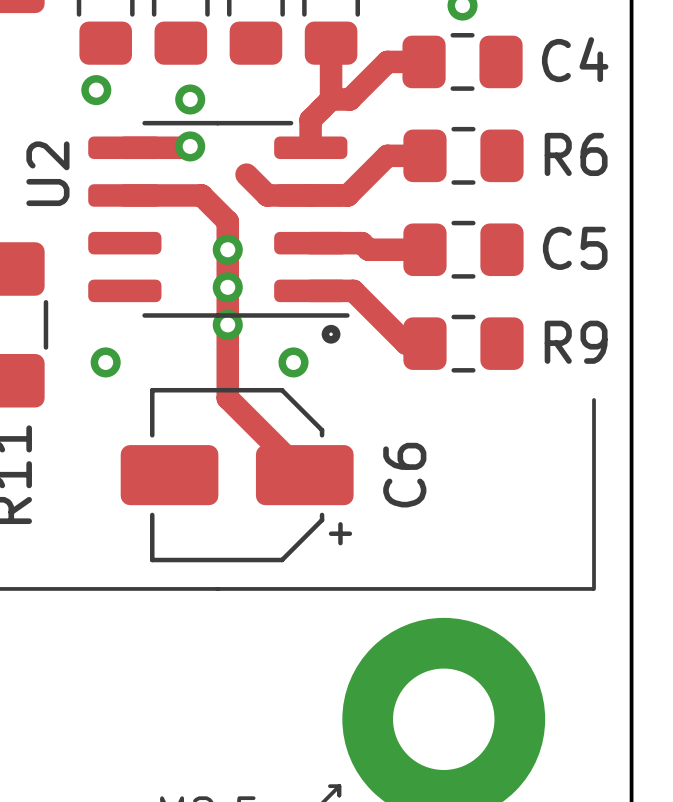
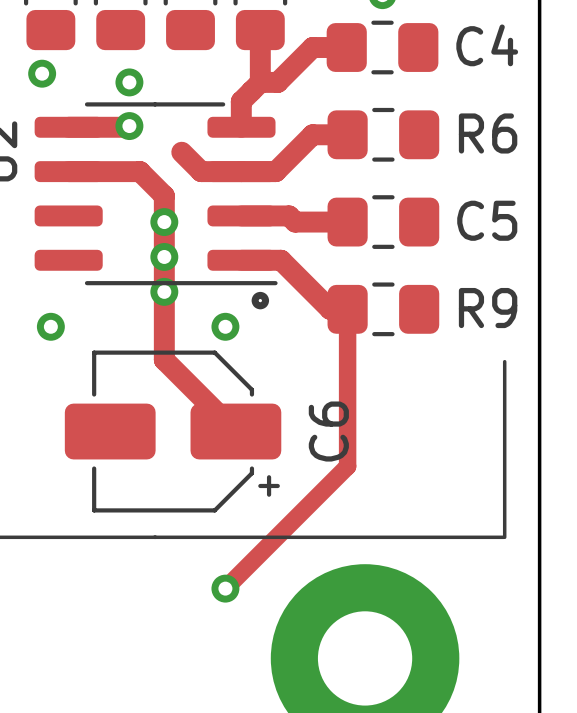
track: none -> (347, 309) (347, 466) (225, 588)
via: none -> (225, 588)

